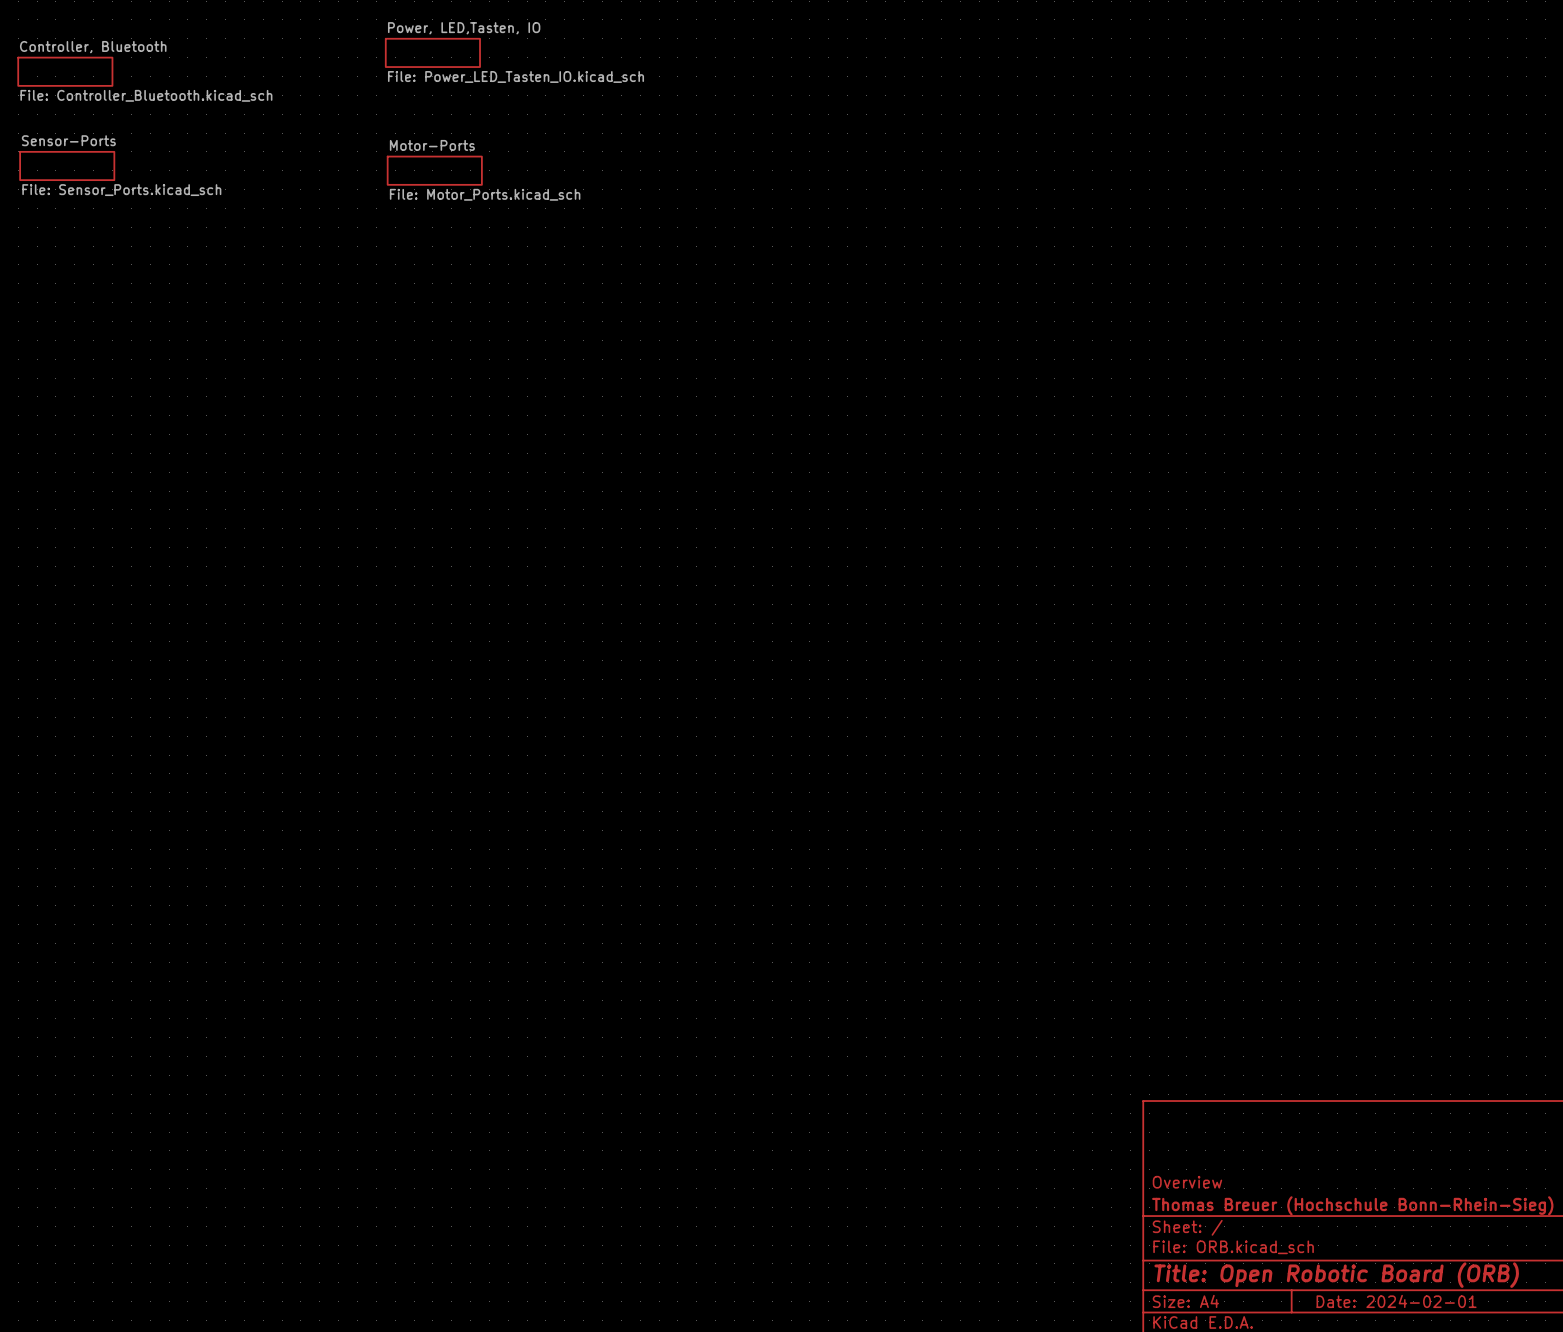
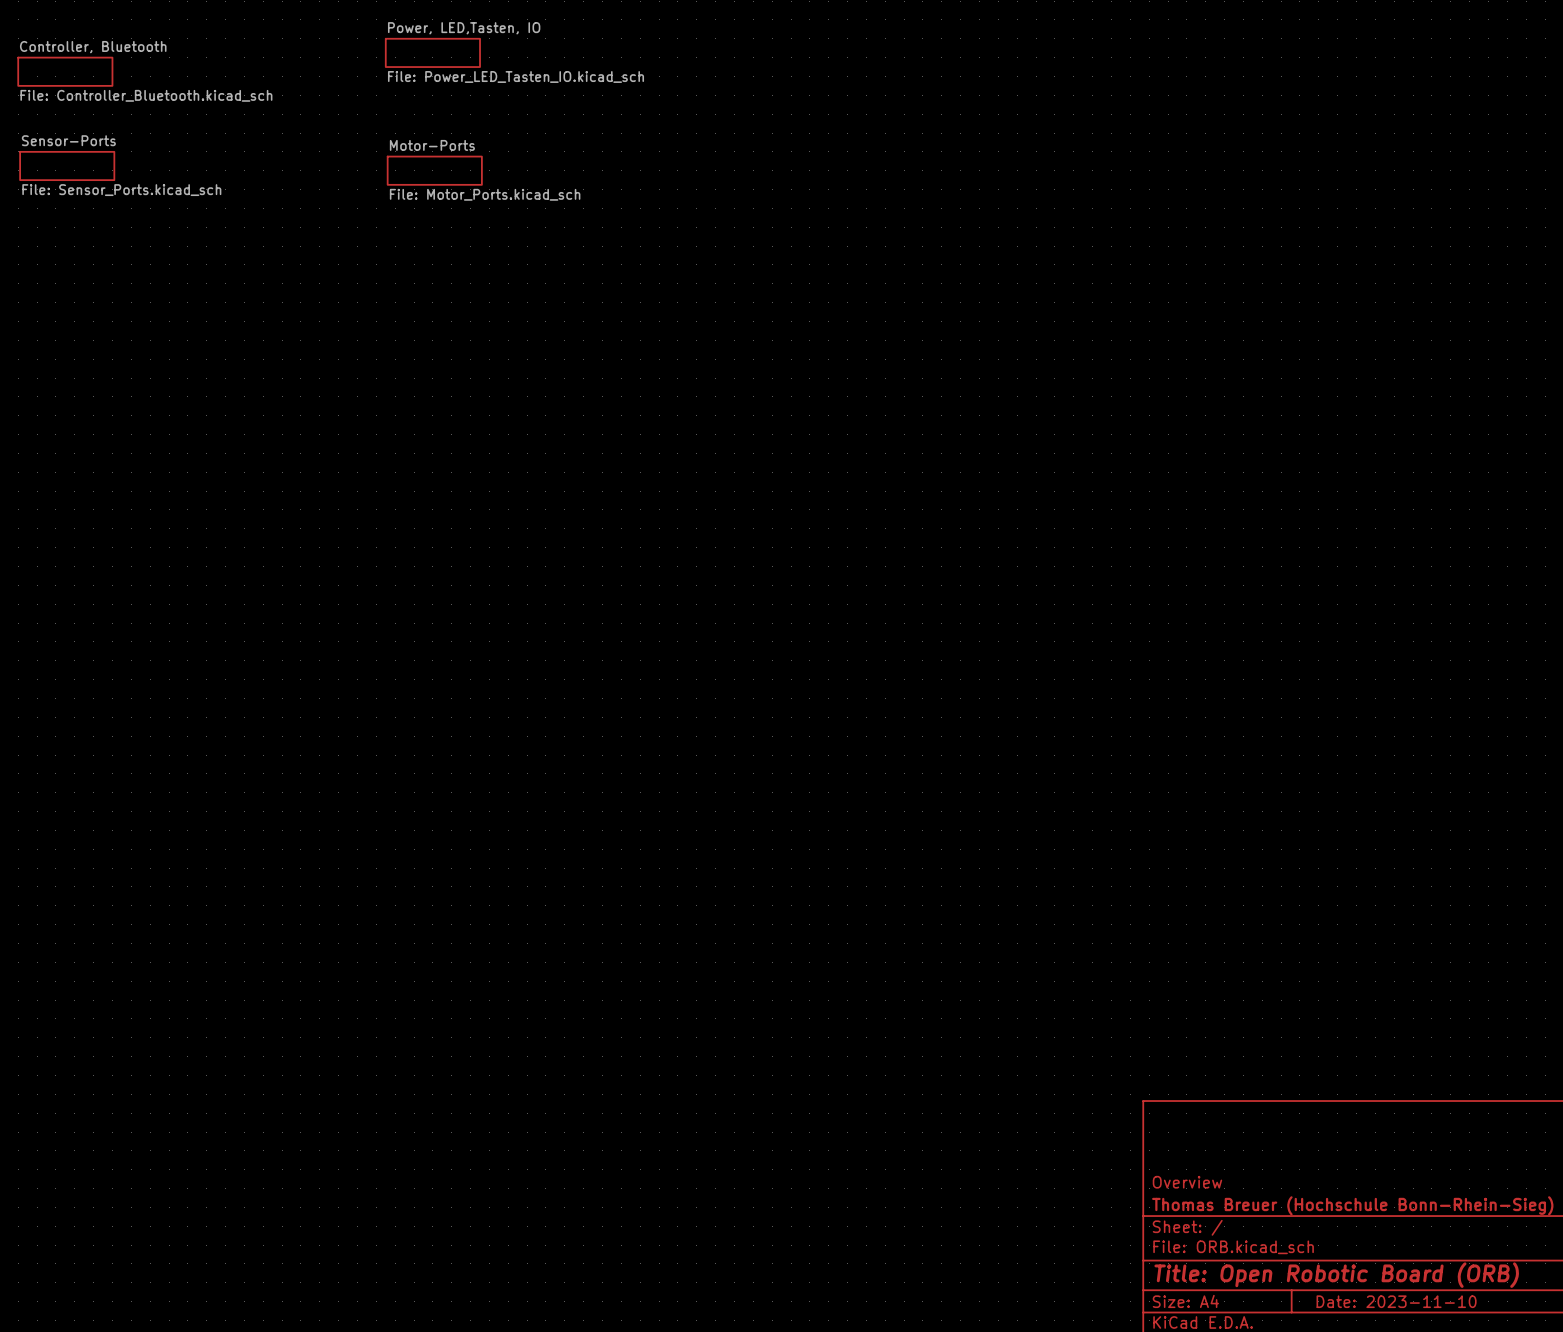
title block: Date: 2024-02-01 (1396, 1301) -> Date: 2023-11-10 (1396, 1301)

